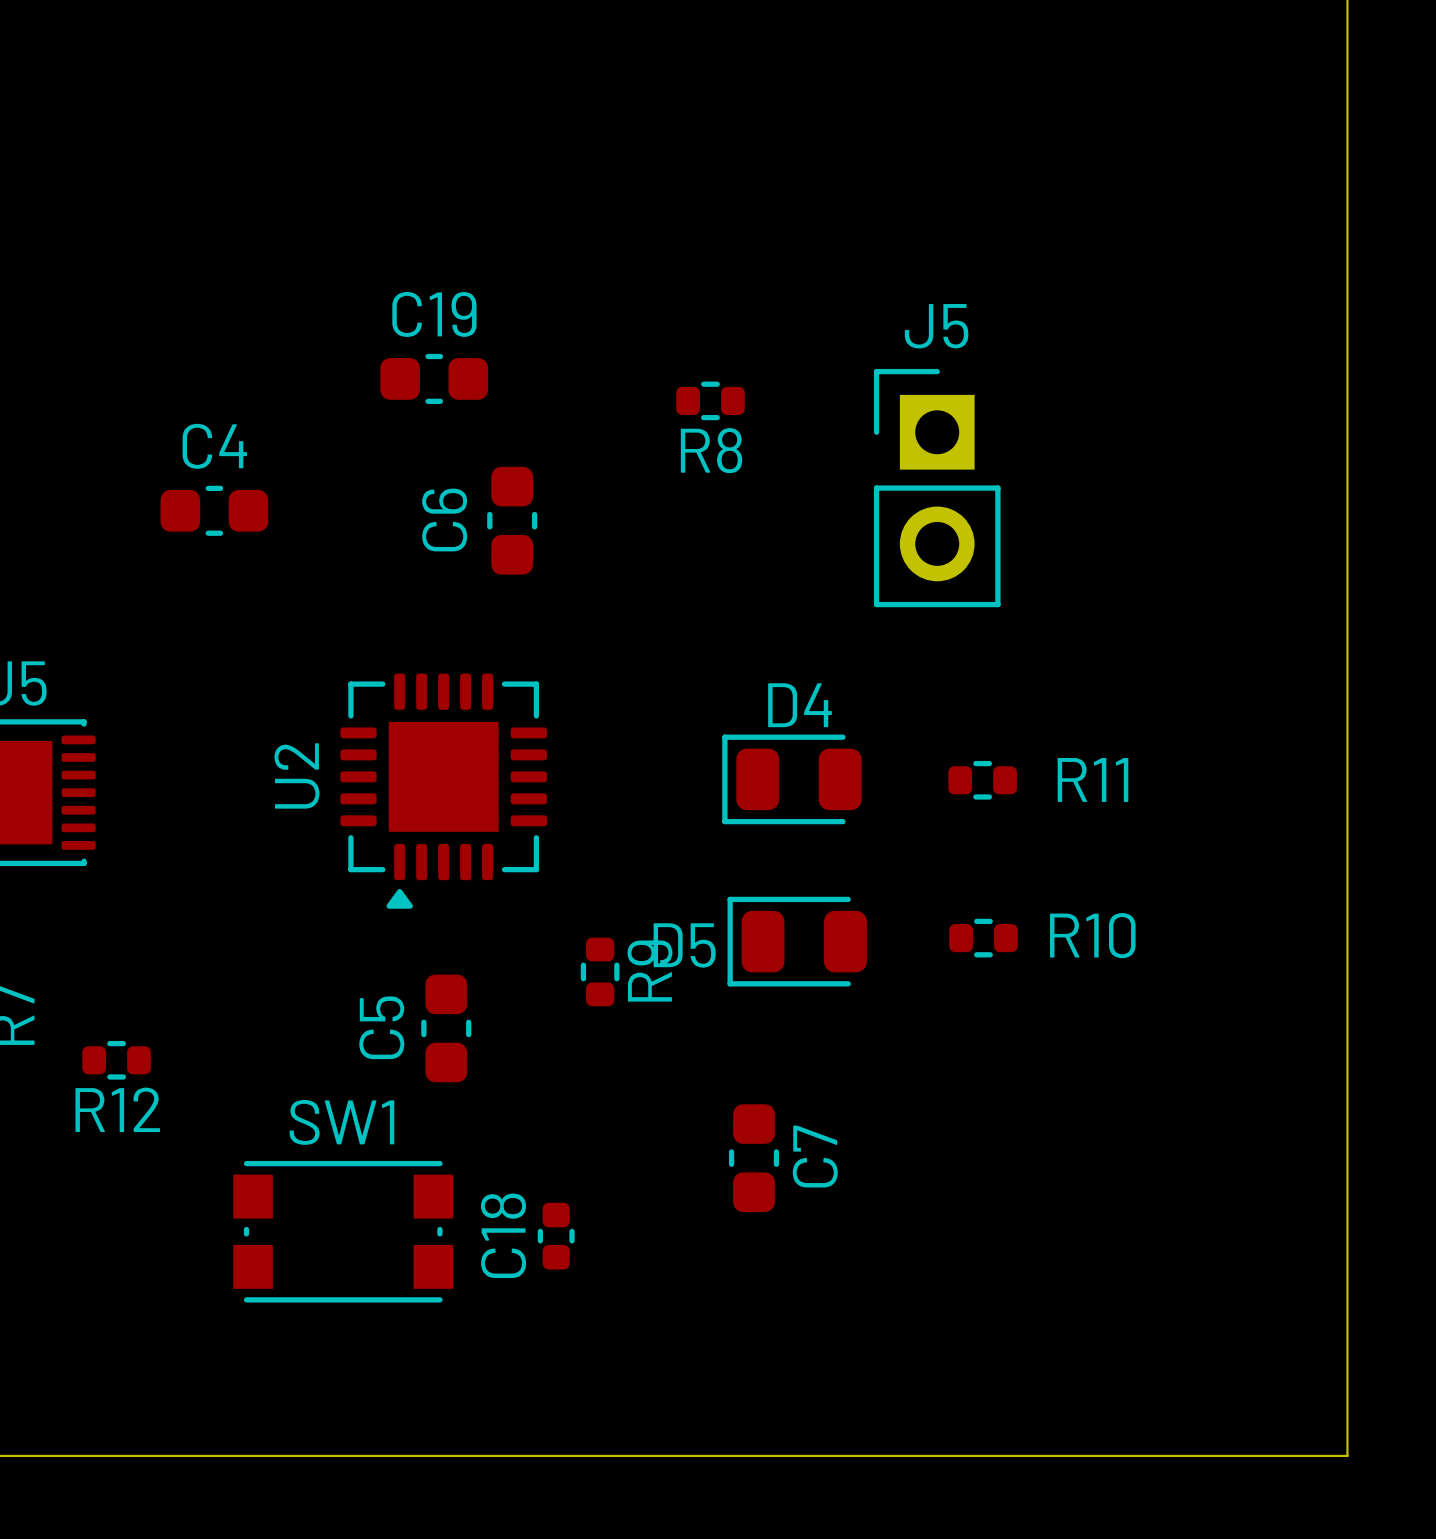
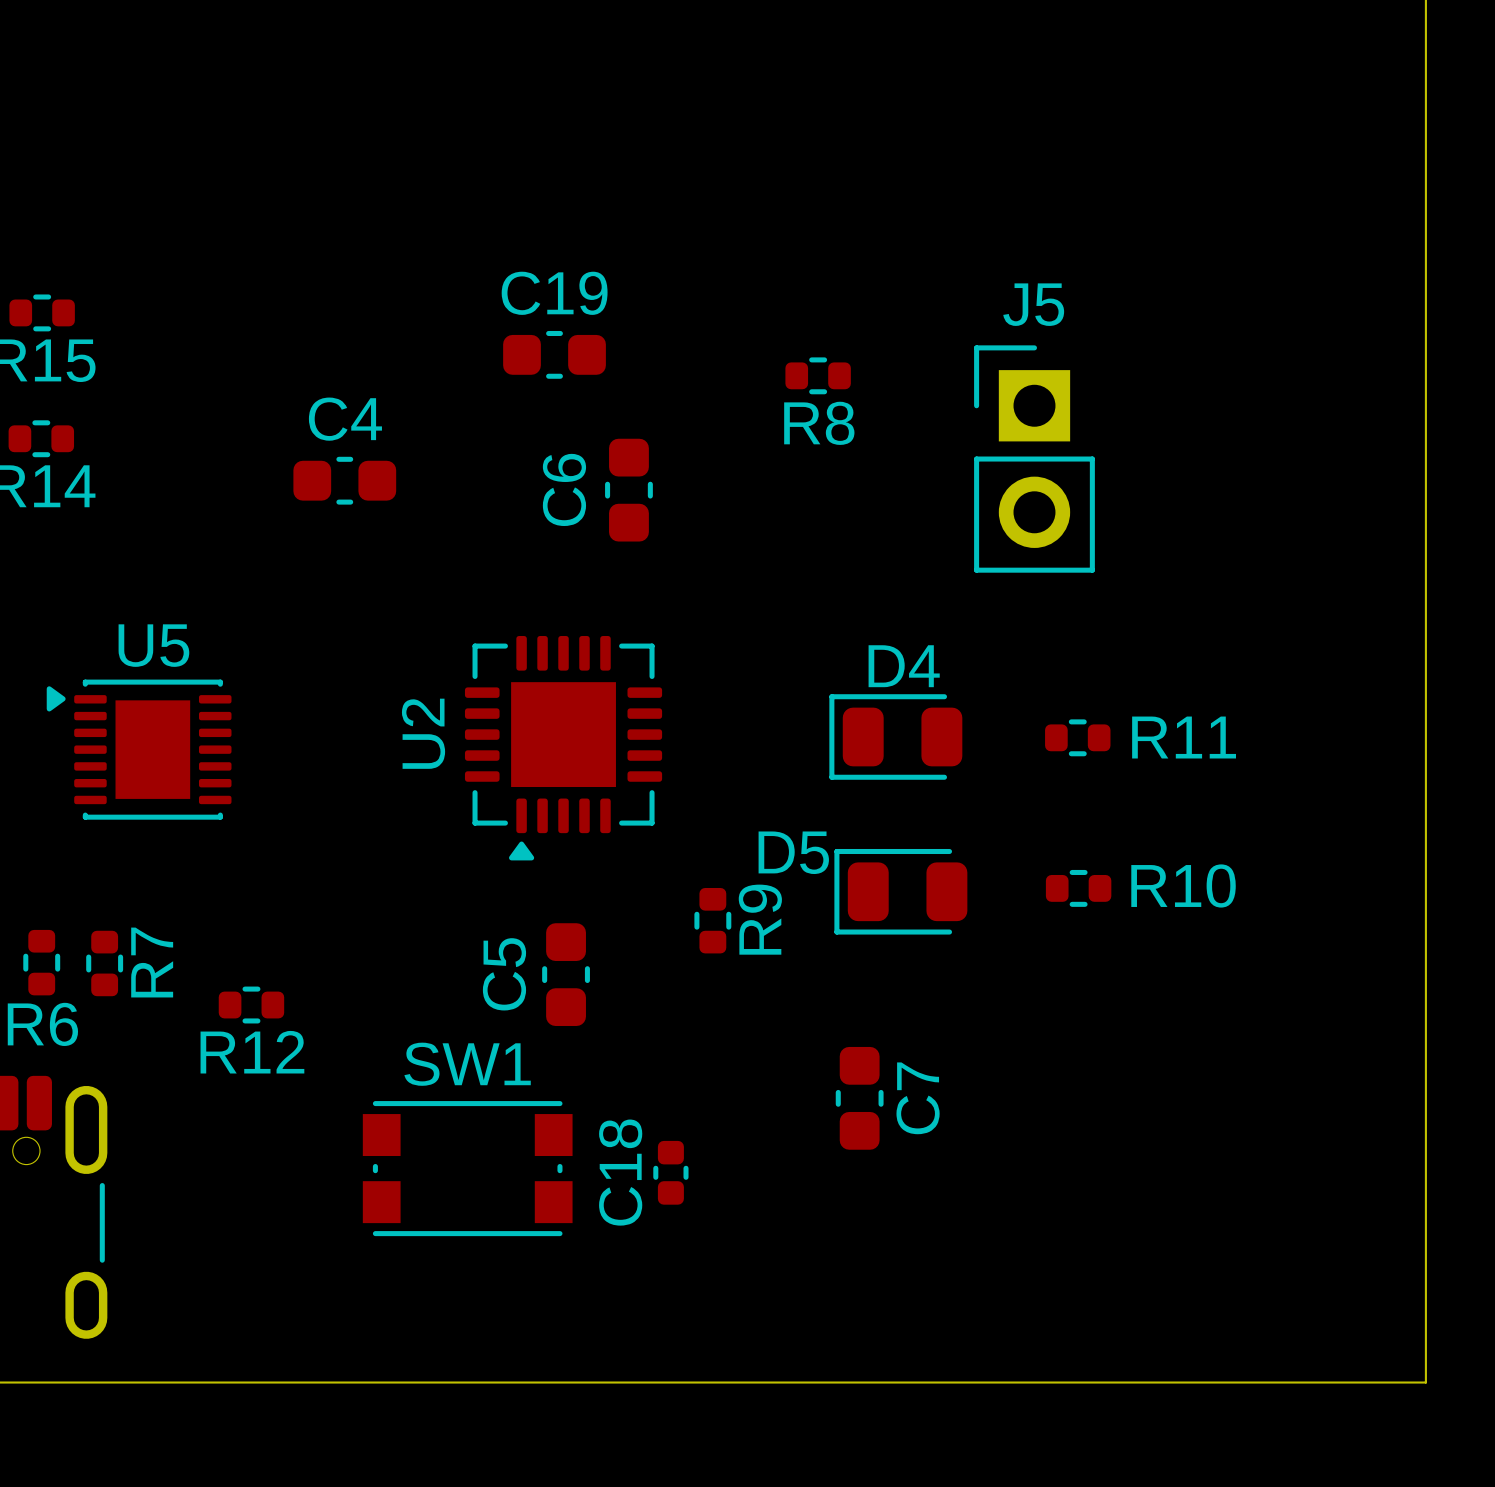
D5 name position: D5 (684, 945) -> D5 (793, 852)

